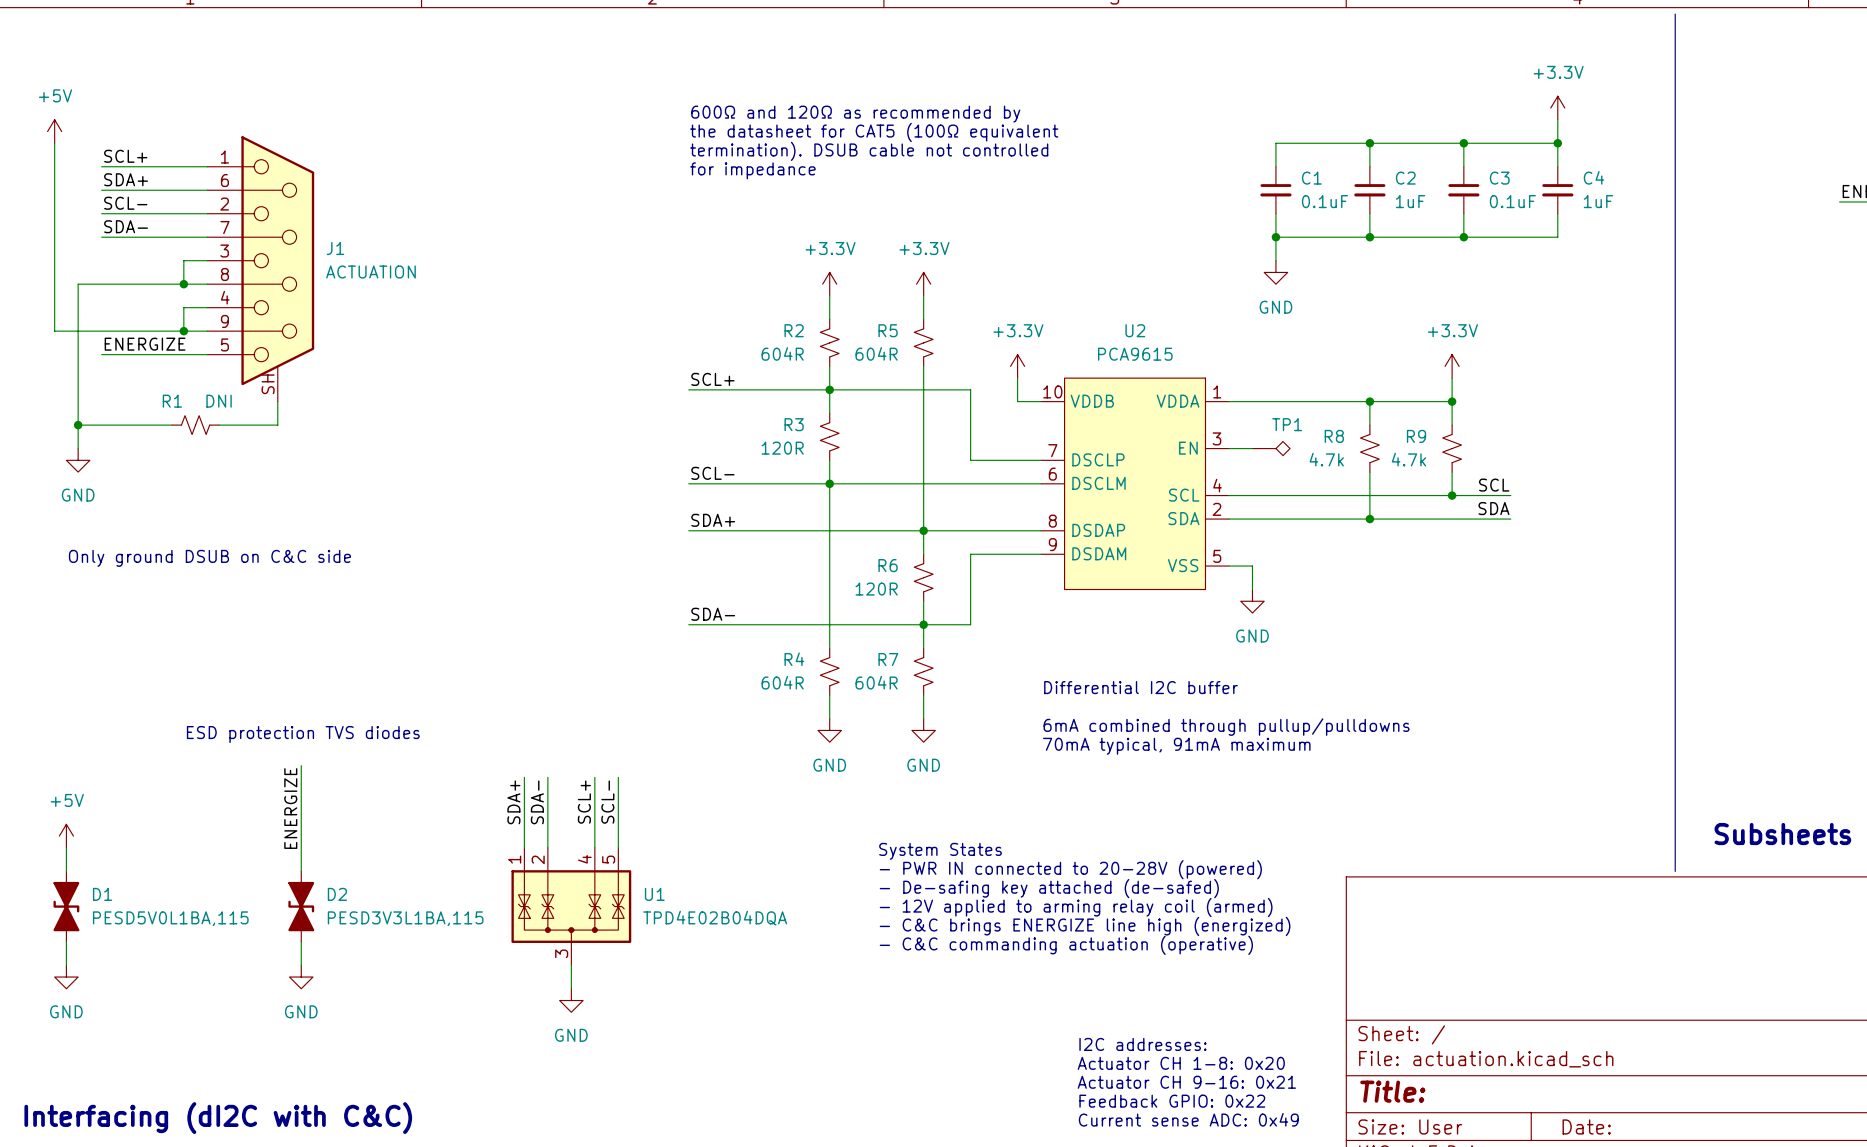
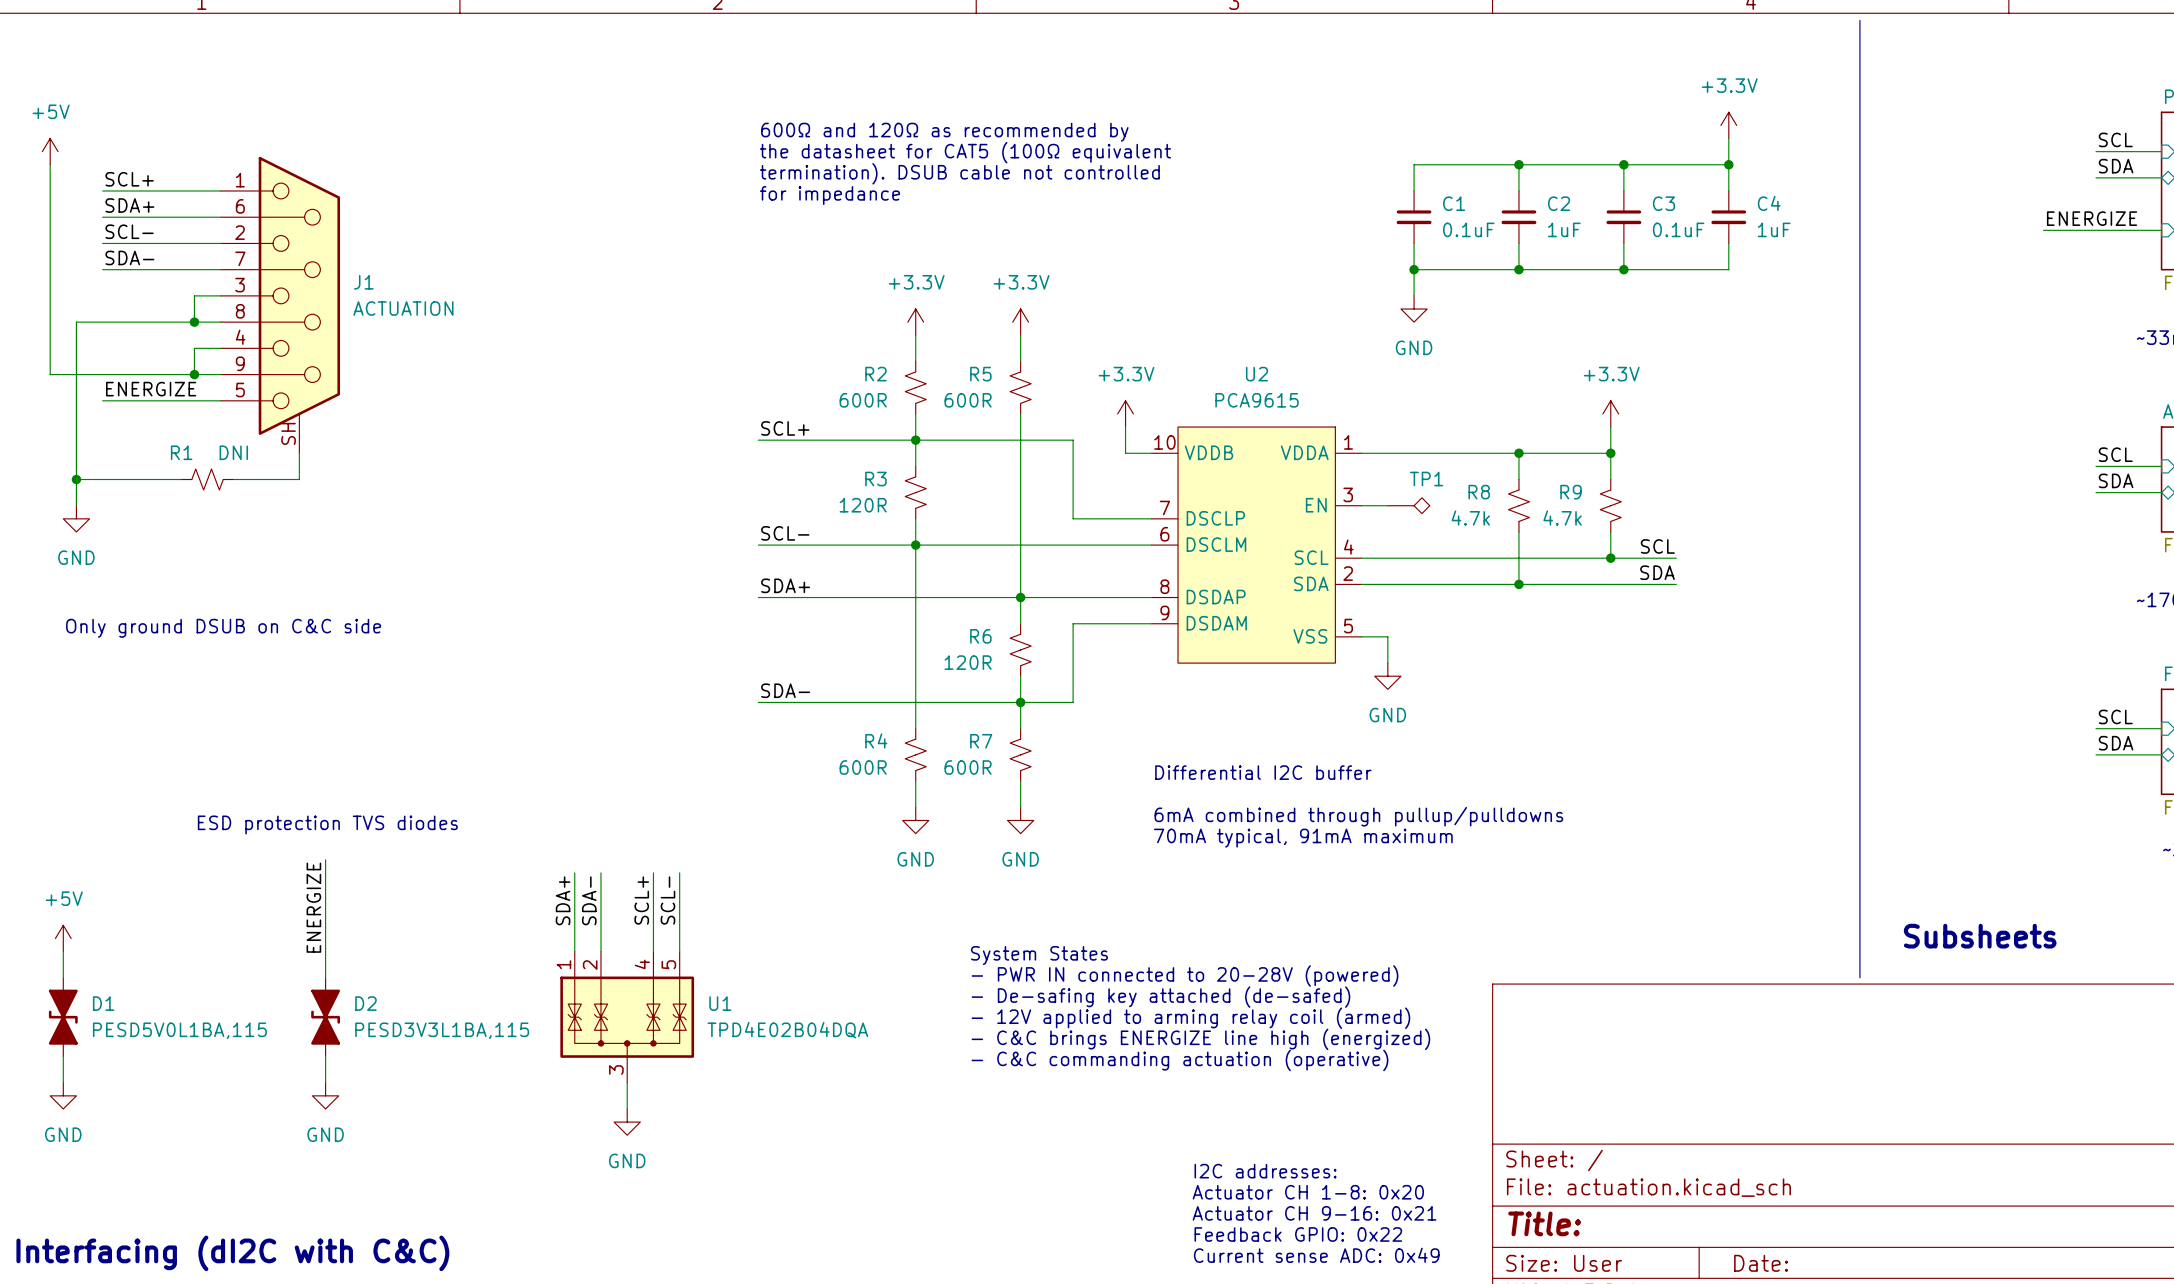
R2 value: 604R (782, 353) -> 600R (863, 400)
R5 value: 604R (876, 353) -> 600R (968, 400)
R4 value: 604R (782, 682) -> 600R (863, 767)
R7 value: 604R (876, 682) -> 600R (968, 767)

